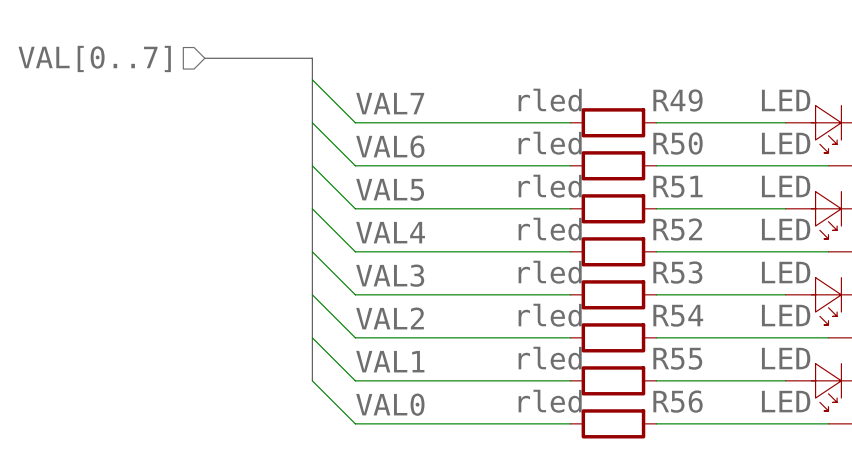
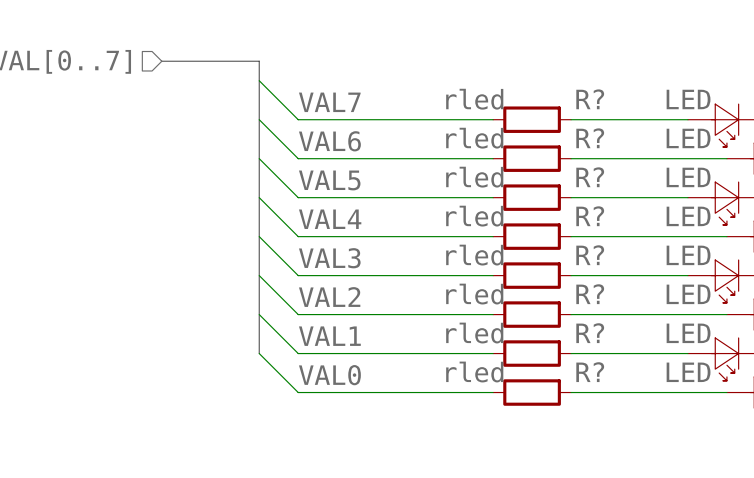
R49 name: R49 (677, 100) -> R? (590, 99)
R50 name: R50 (678, 143) -> R? (590, 138)
R51 name: R51 (677, 186) -> R? (590, 177)
R52 name: R52 (677, 229) -> R? (590, 216)
R53 name: R53 (677, 272) -> R? (590, 255)
R54 name: R54 (678, 315) -> R? (590, 294)
R55 name: R55 (677, 358) -> R? (590, 333)
R56 name: R56 (678, 401) -> R? (590, 372)

